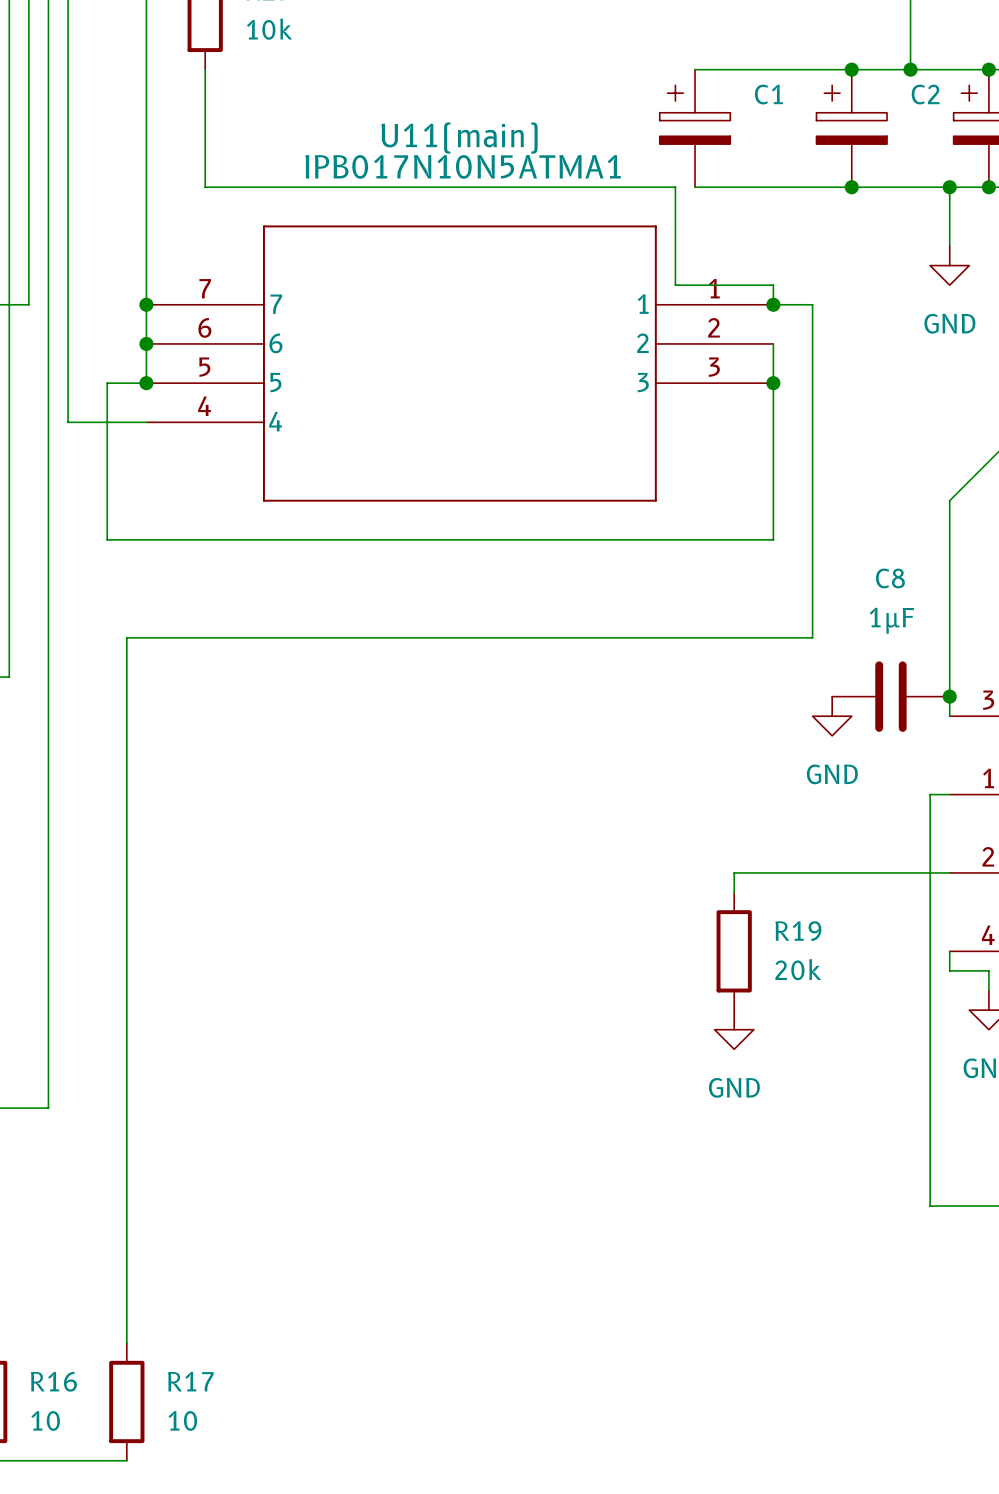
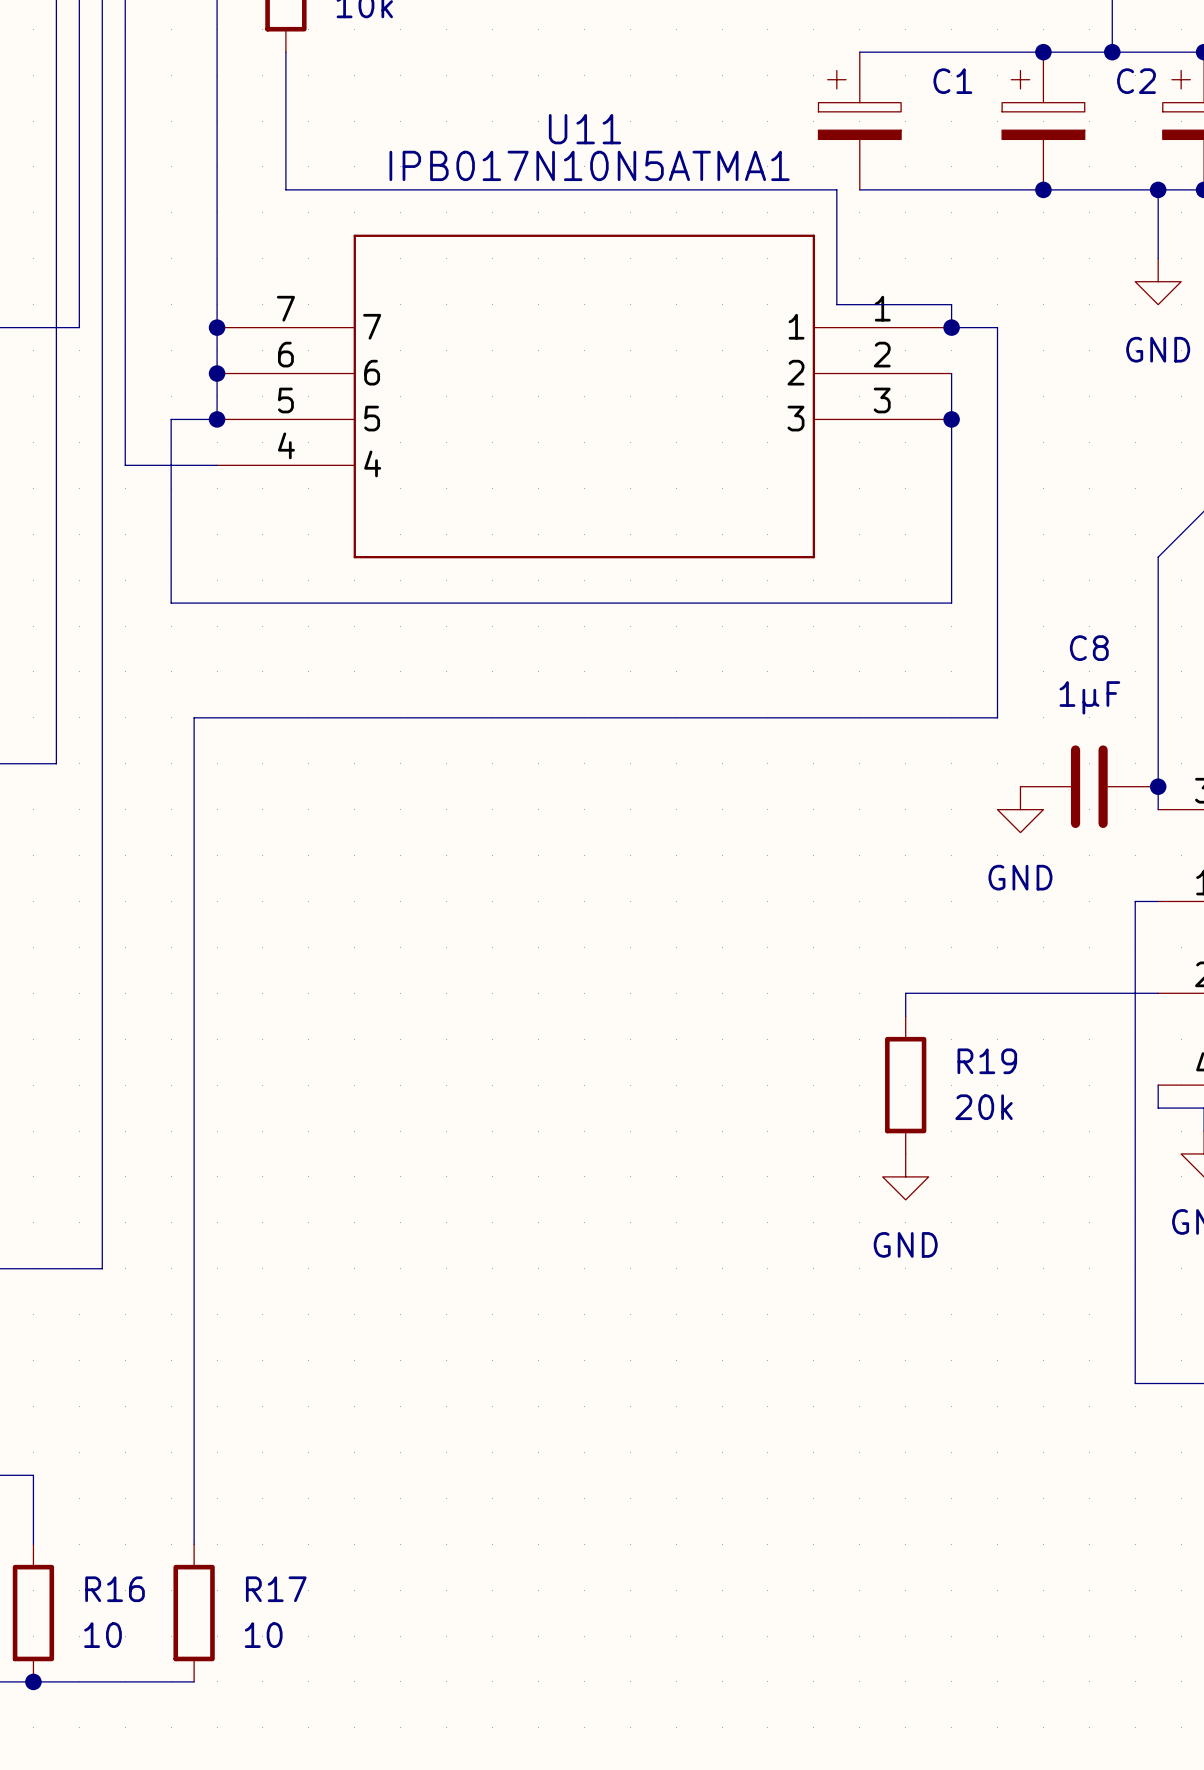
U11(main) name: U11(main) (459, 138) -> U11 (584, 129)

